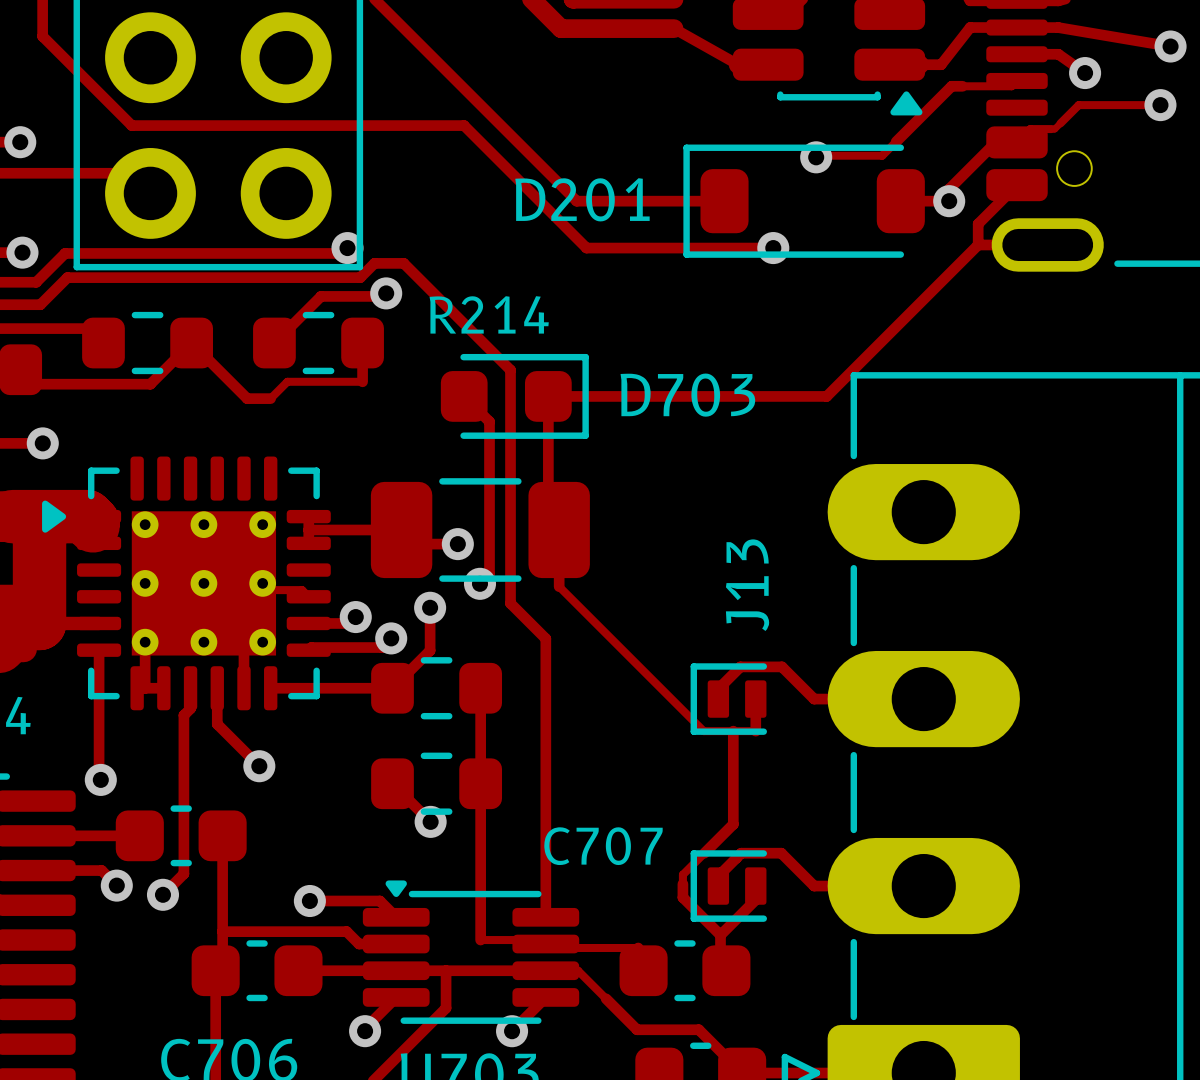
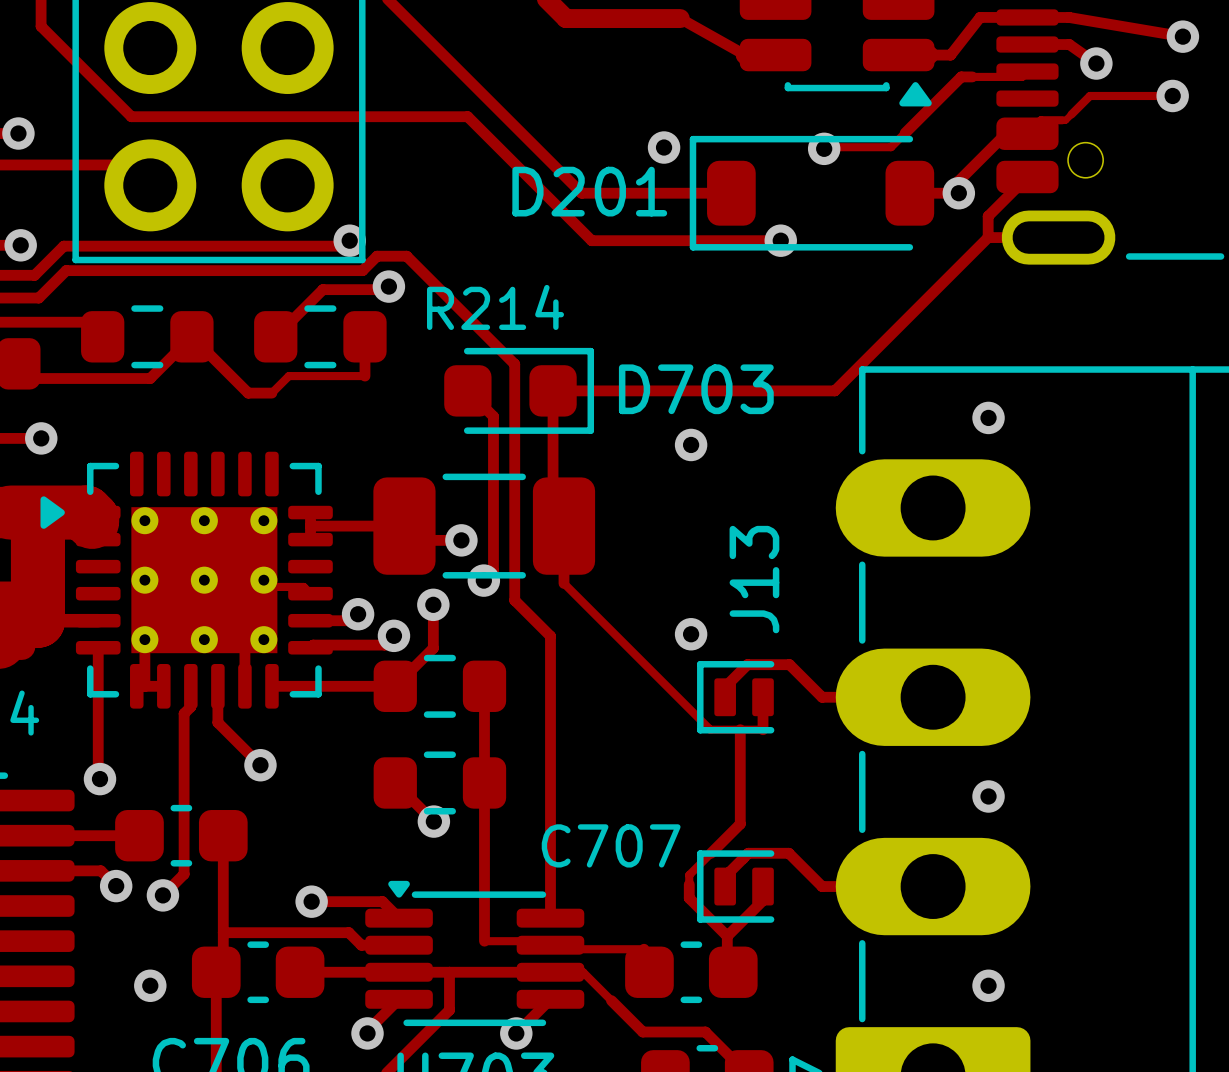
via: none -> (664, 147)
via: none -> (988, 417)
via: none -> (691, 444)
via: none -> (691, 634)
via: none -> (988, 796)
via: none -> (150, 985)
via: none -> (988, 985)

